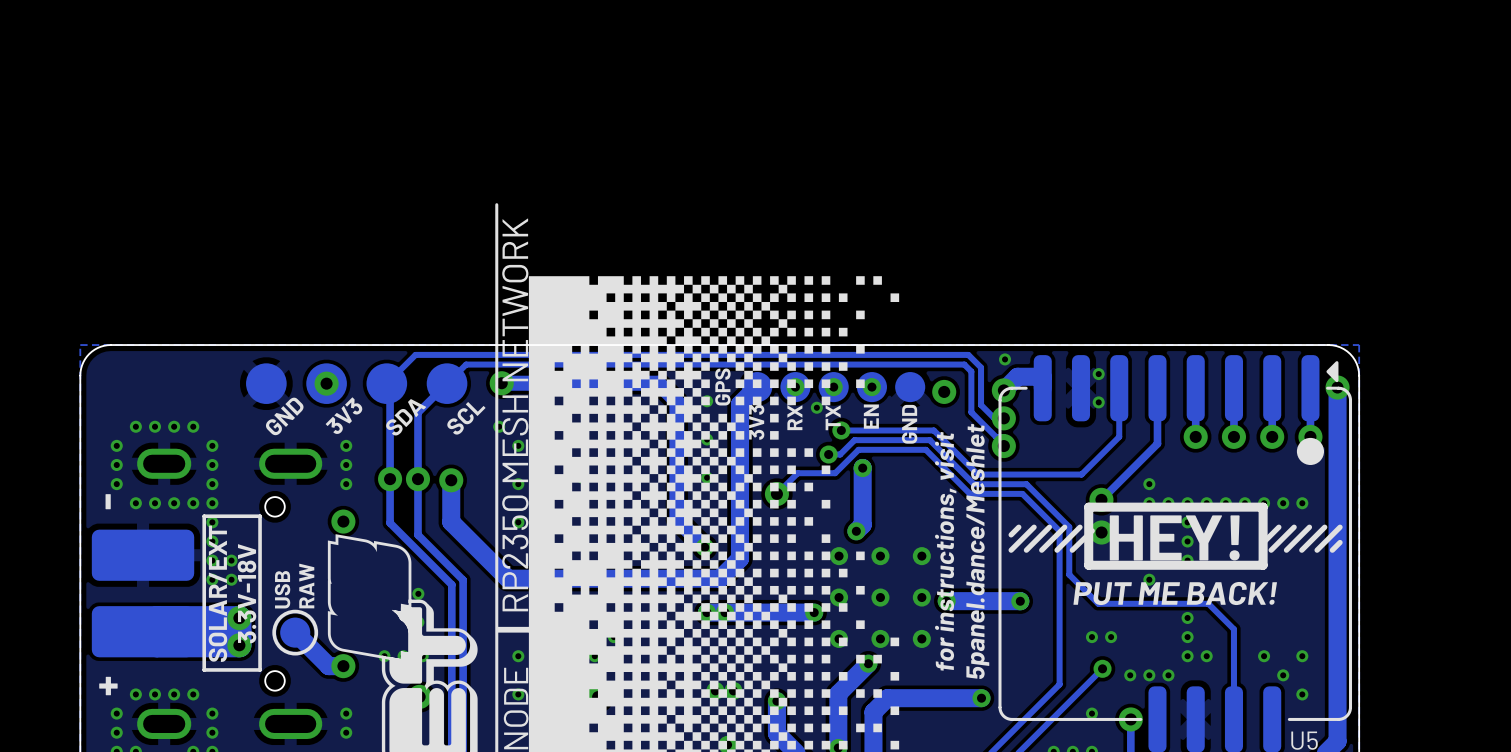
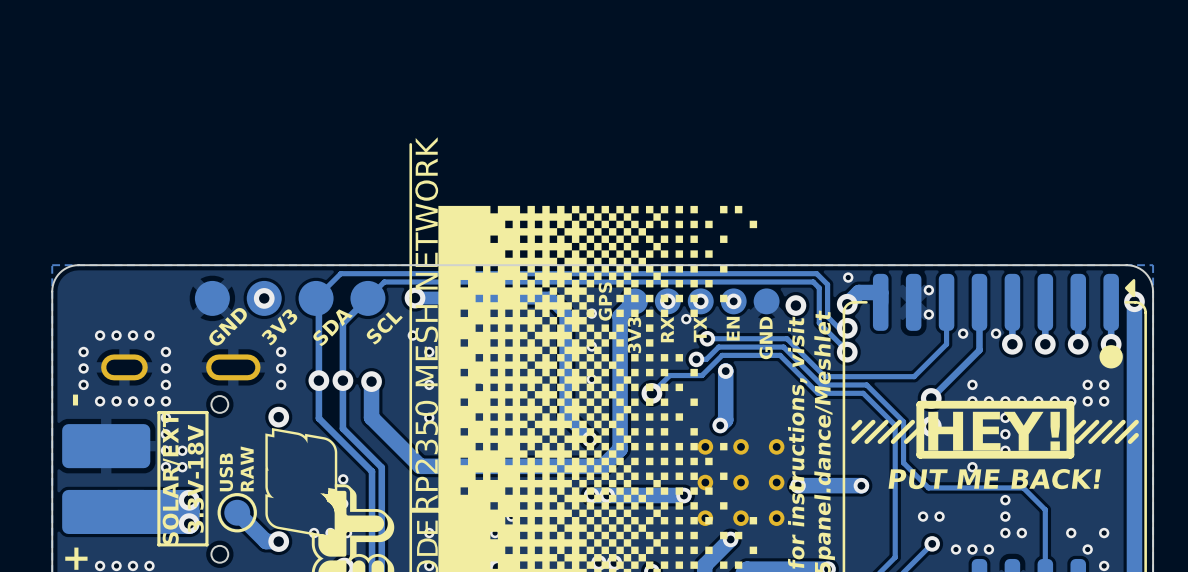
via: none -> (963, 333)
via: none -> (996, 333)
via: none -> (1087, 384)
via: none -> (1104, 384)

